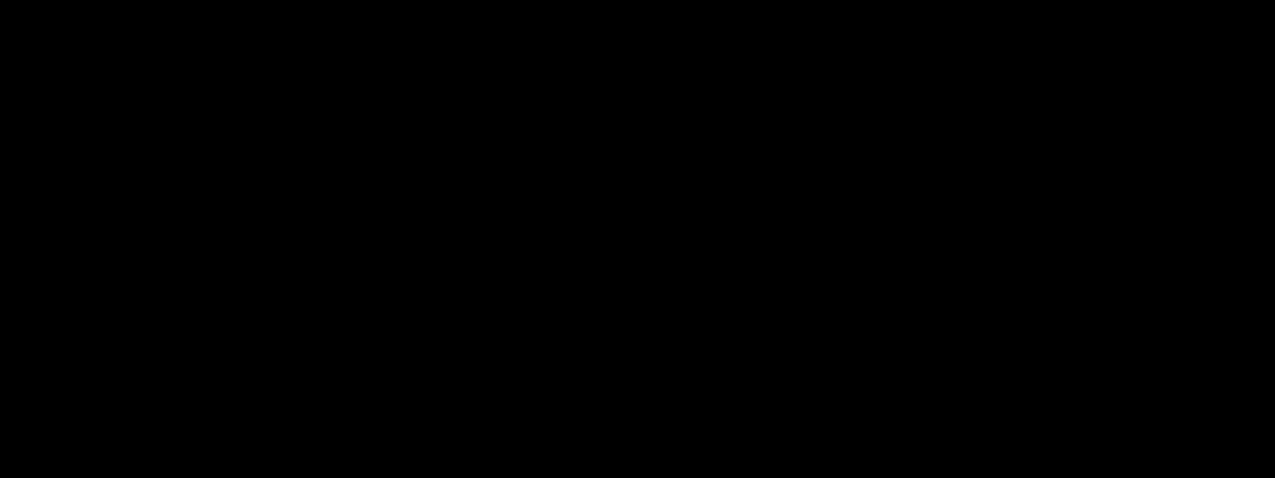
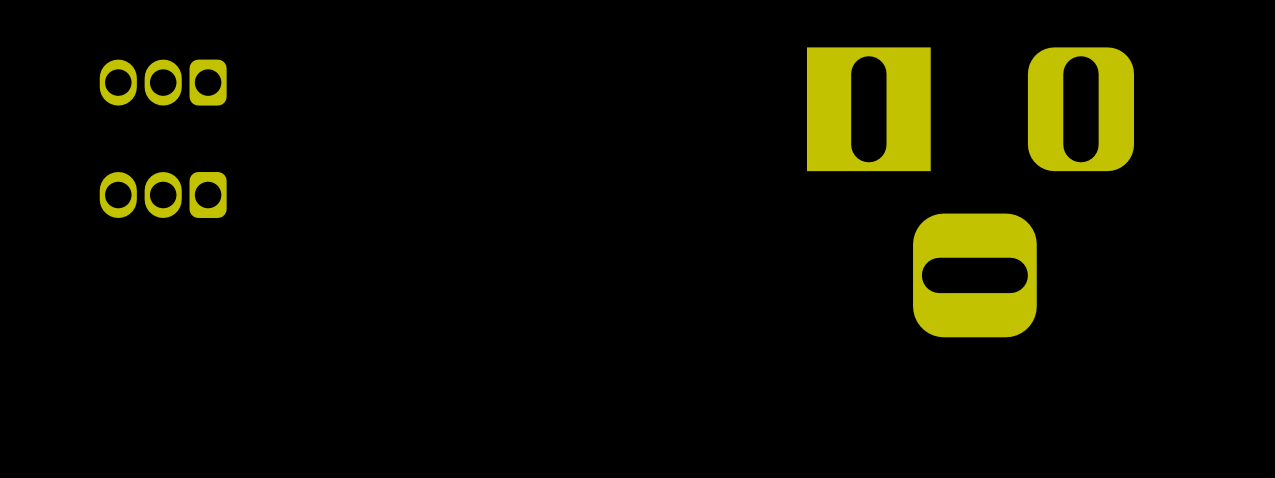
part: none -> (163, 82)
part: none -> (970, 192)
part: none -> (163, 195)

